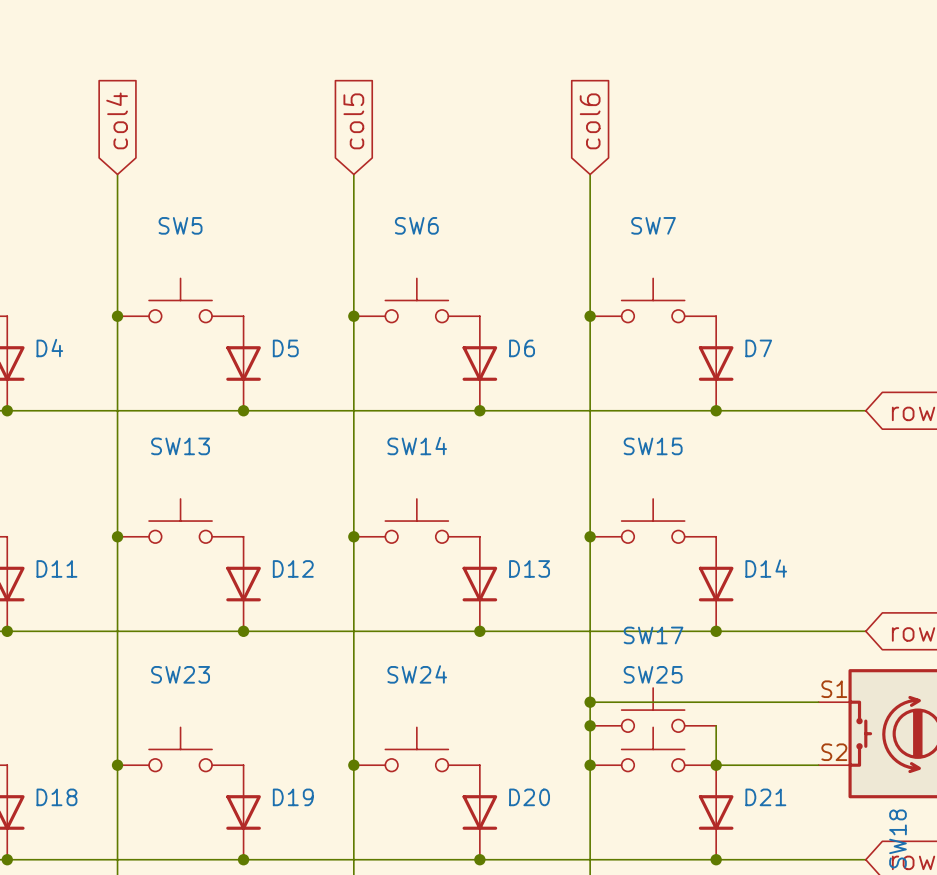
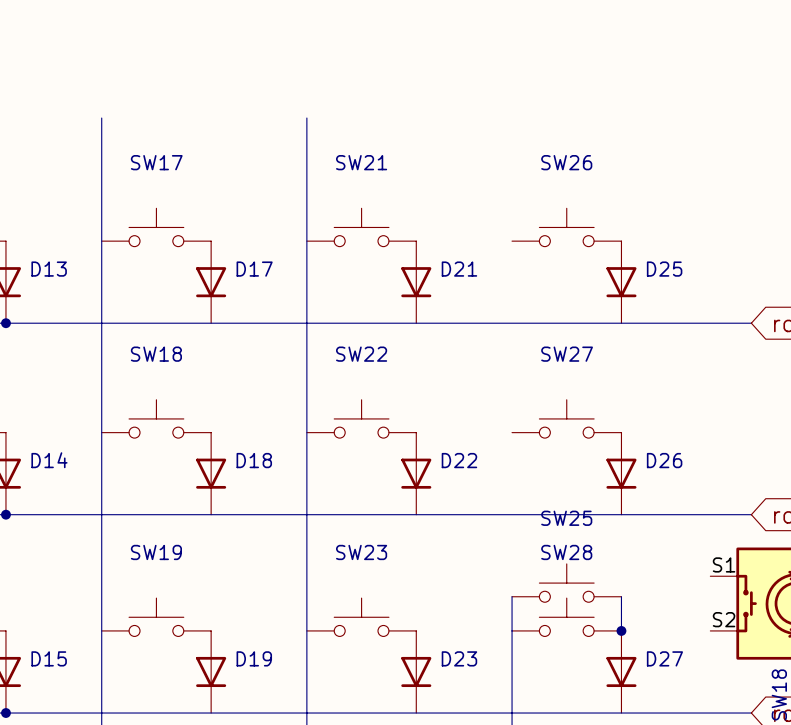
global label: col4 (117, 120) -> none
global label: col5 (353, 121) -> none
global label: col6 (590, 121) -> none
wire: (590, 174) (590, 725) -> none
SW5 name: SW5 (180, 225) -> SW17 (156, 162)
SW6 name: SW6 (416, 225) -> SW21 (361, 162)
SW7 name: SW7 (653, 225) -> SW26 (566, 162)
junction: (117, 316) -> none
junction: (353, 316) -> none
junction: (590, 316) -> none
D4 name: D4 (49, 348) -> D13 (49, 269)
D5 name: D5 (285, 348) -> D17 (254, 269)
D6 name: D6 (522, 348) -> D21 (459, 269)
D7 name: D7 (758, 348) -> D25 (664, 269)
junction: (243, 410) -> none
junction: (479, 410) -> none
junction: (716, 410) -> none
SW13 name: SW13 (180, 446) -> SW18 (156, 354)
SW14 name: SW14 (417, 446) -> SW22 (361, 354)
SW15 name: SW15 (653, 446) -> SW27 (567, 354)
junction: (117, 536) -> none
junction: (353, 536) -> none
junction: (590, 536) -> none
D11 name: D11 (56, 568) -> D14 (49, 460)
D12 name: D12 (293, 568) -> D18 (254, 460)
D13 name: D13 (529, 568) -> D22 (459, 460)
D14 name: D14 (766, 568) -> D26 (664, 460)
junction: (243, 631) -> none
junction: (479, 631) -> none
junction: (716, 631) -> none
SW17 name: SW17 (653, 635) -> SW25 (566, 518)
SW23 name: SW23 (180, 674) -> SW19 (156, 552)
SW24 name: SW24 (417, 674) -> SW23 (361, 552)
SW25 name: SW25 (653, 674) -> SW28 (566, 552)
wire: (590, 702) (818, 702) -> none
junction: (590, 702) -> none
junction: (590, 725) -> none
junction: (117, 765) -> none
junction: (353, 765) -> none
junction: (590, 765) -> none
wire: (716, 765) (818, 765) -> none
D18 name: D18 (56, 797) -> D15 (49, 658)
D20 name: D20 (529, 797) -> D23 (459, 658)
D21 name: D21 (765, 797) -> D27 (664, 658)
junction: (243, 859) -> none
junction: (479, 859) -> none
junction: (716, 859) -> none

